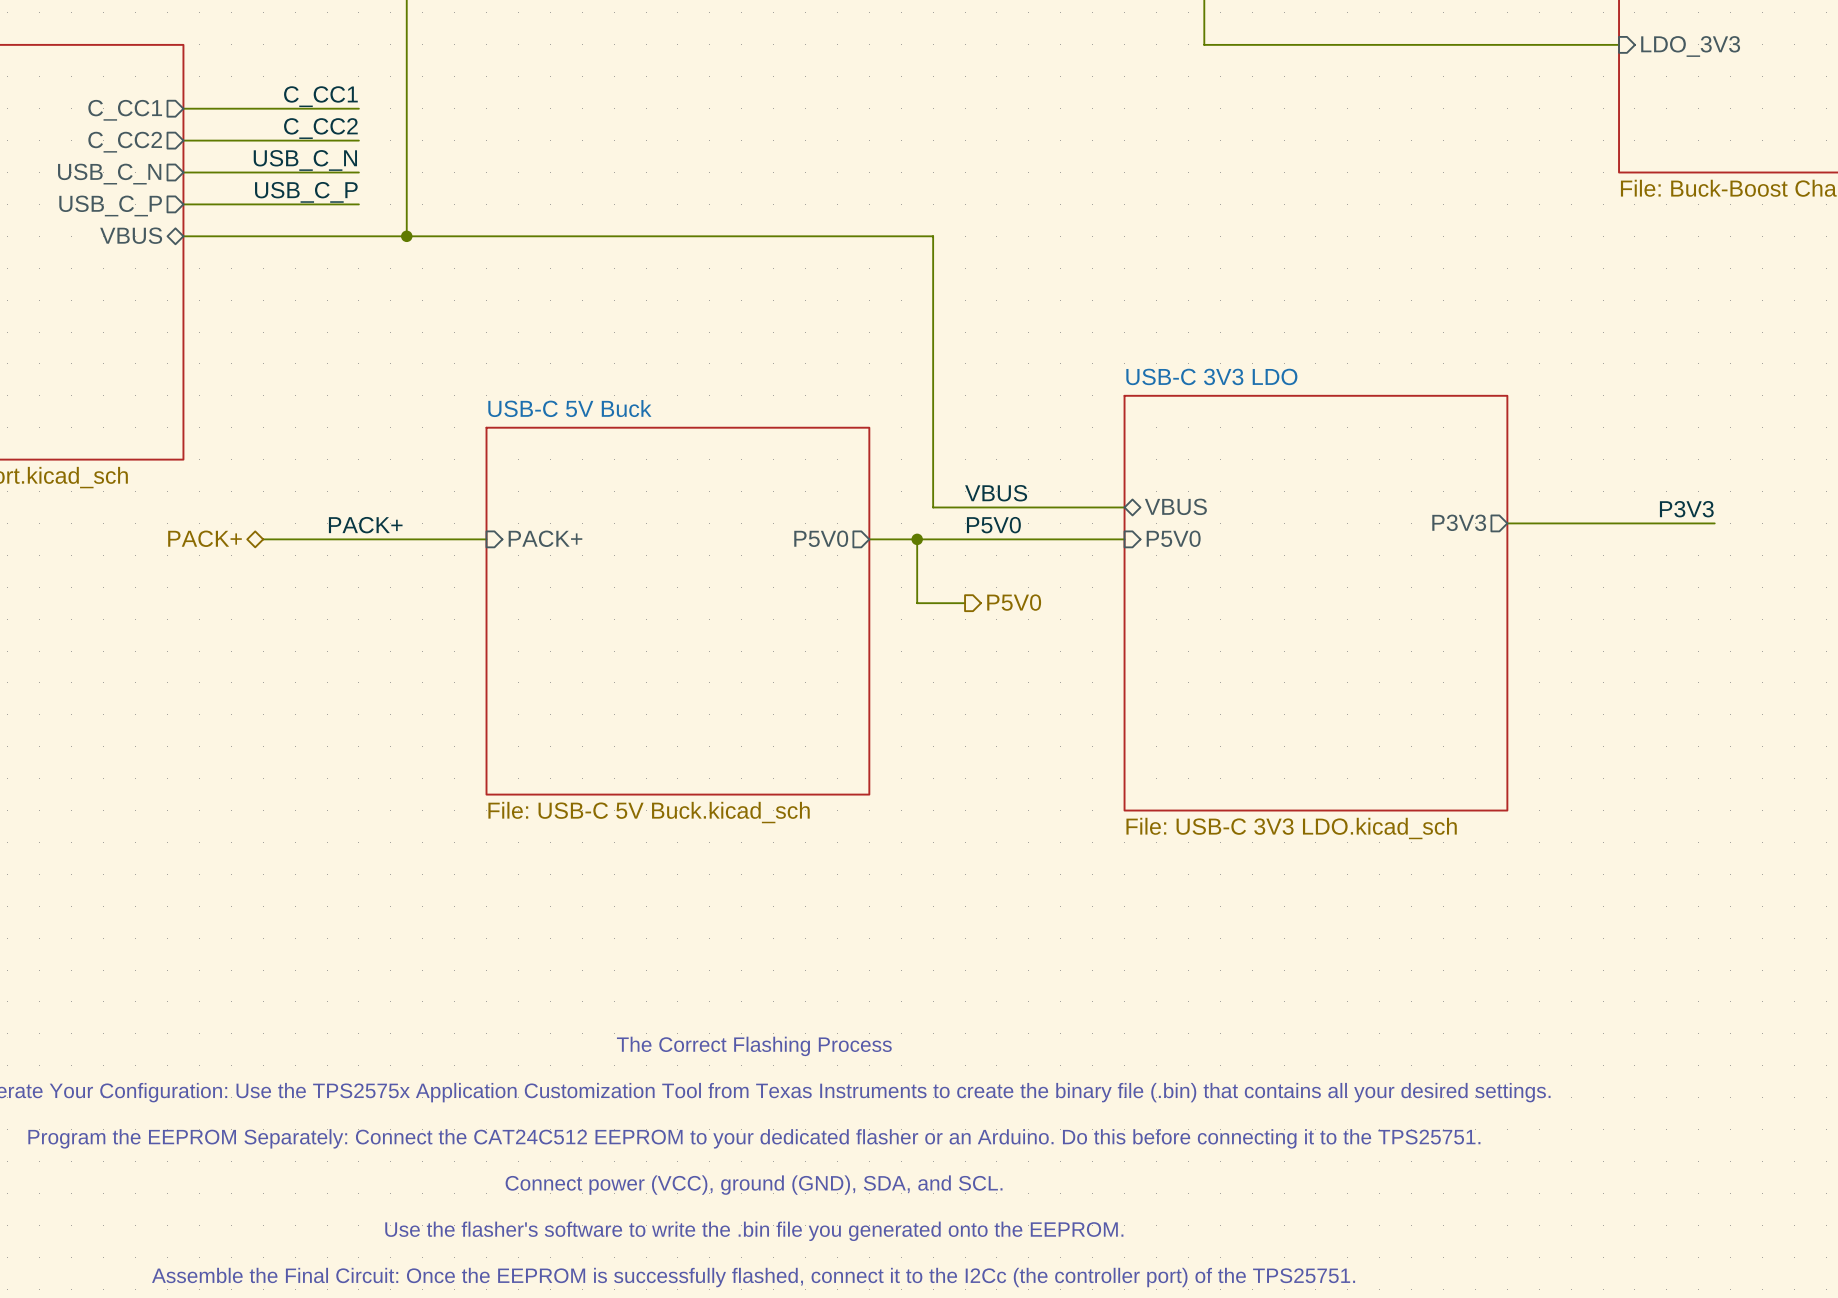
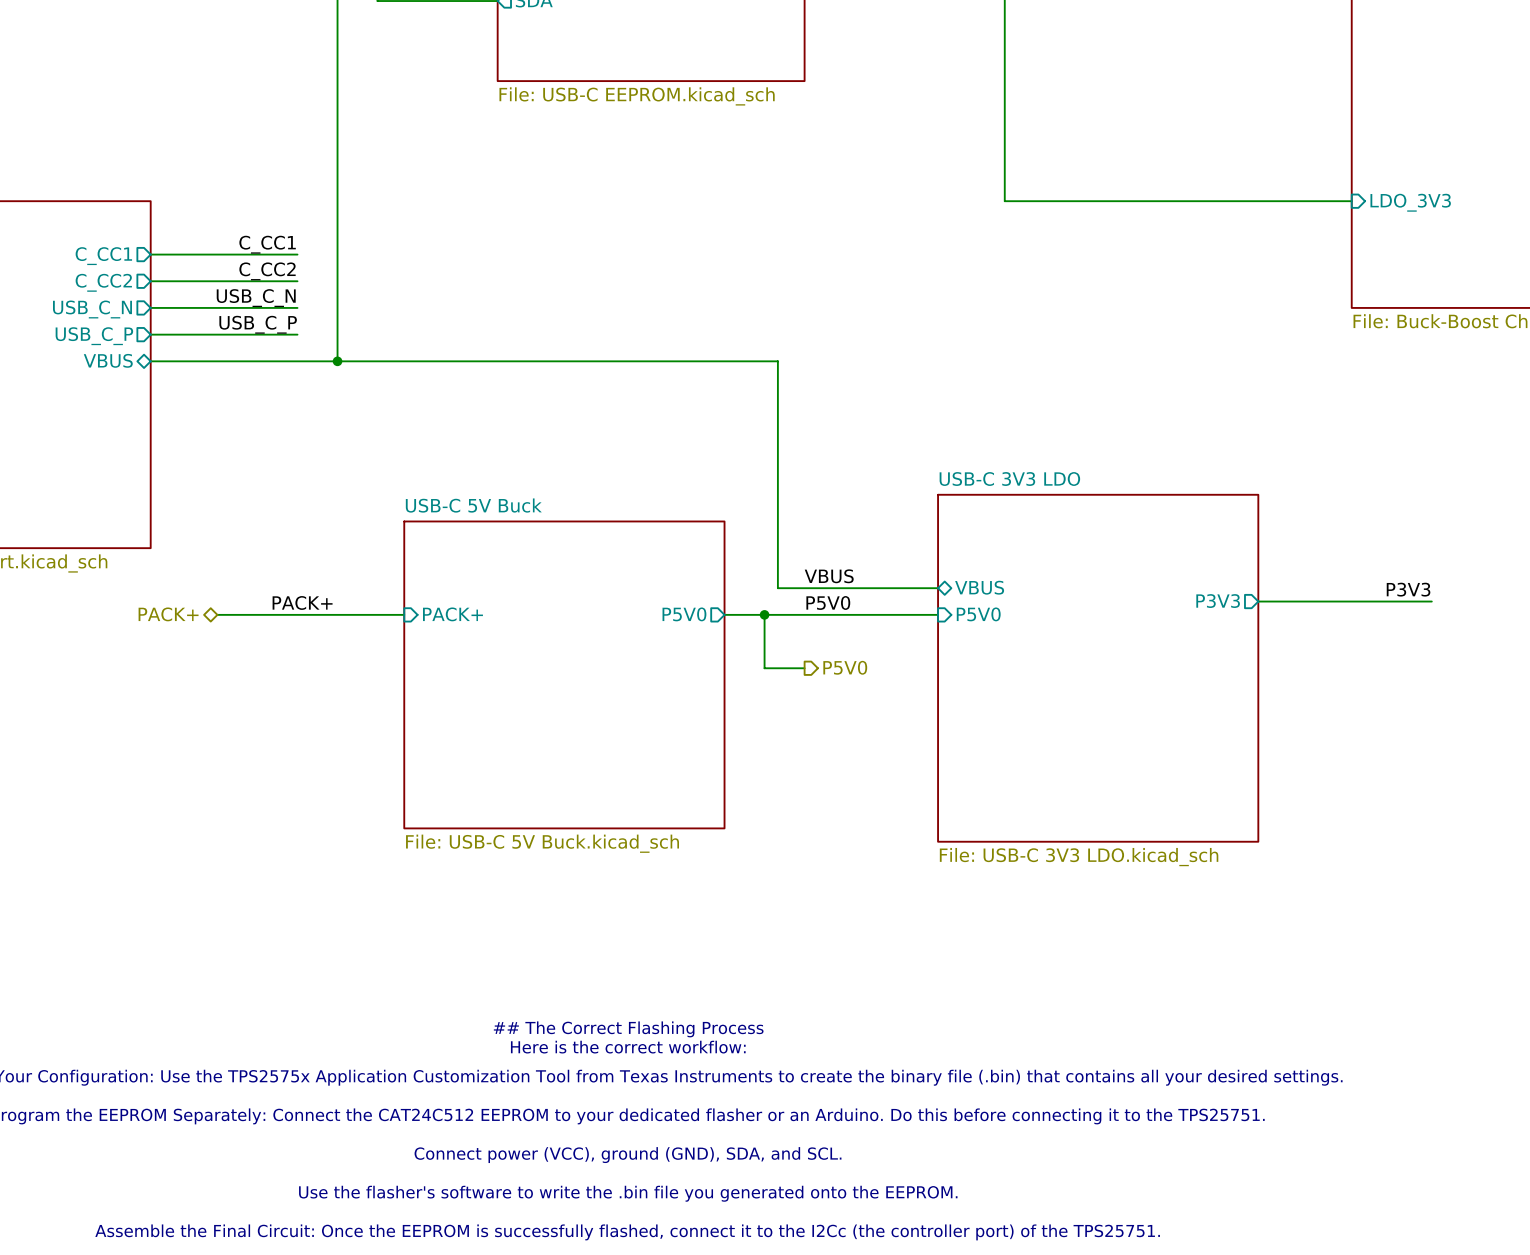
text: The Correct Flashing Process (754, 1046) -> ## The Correct Flashing Process (628, 1029)
text: none -> Here is the correct workflow: (628, 1047)

